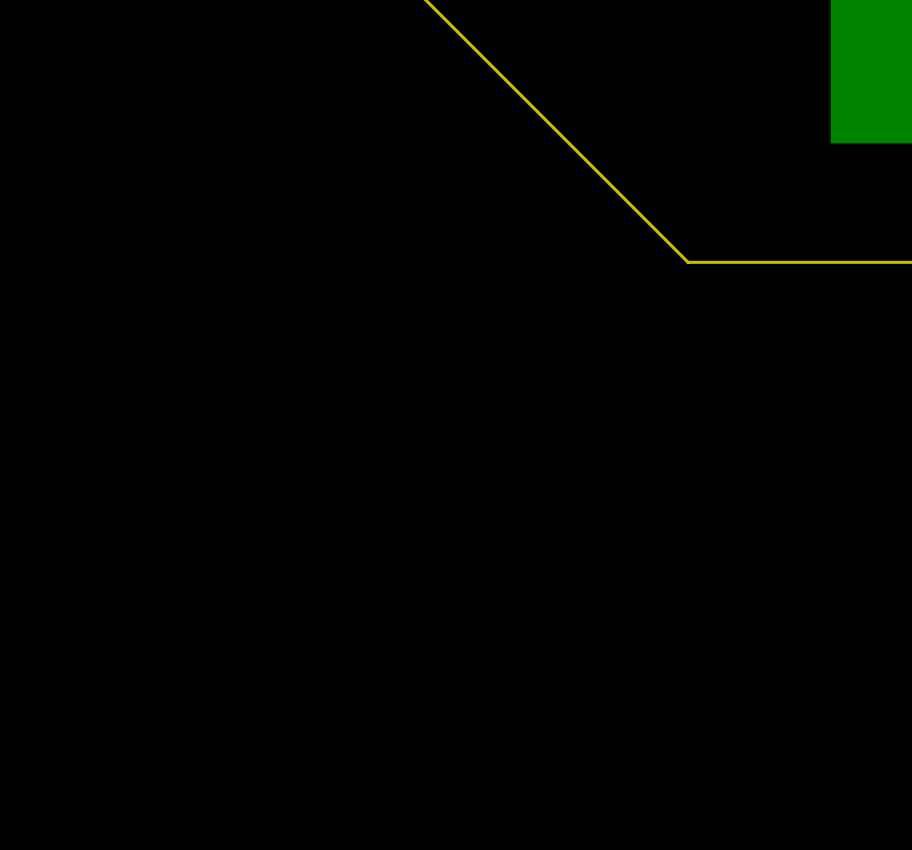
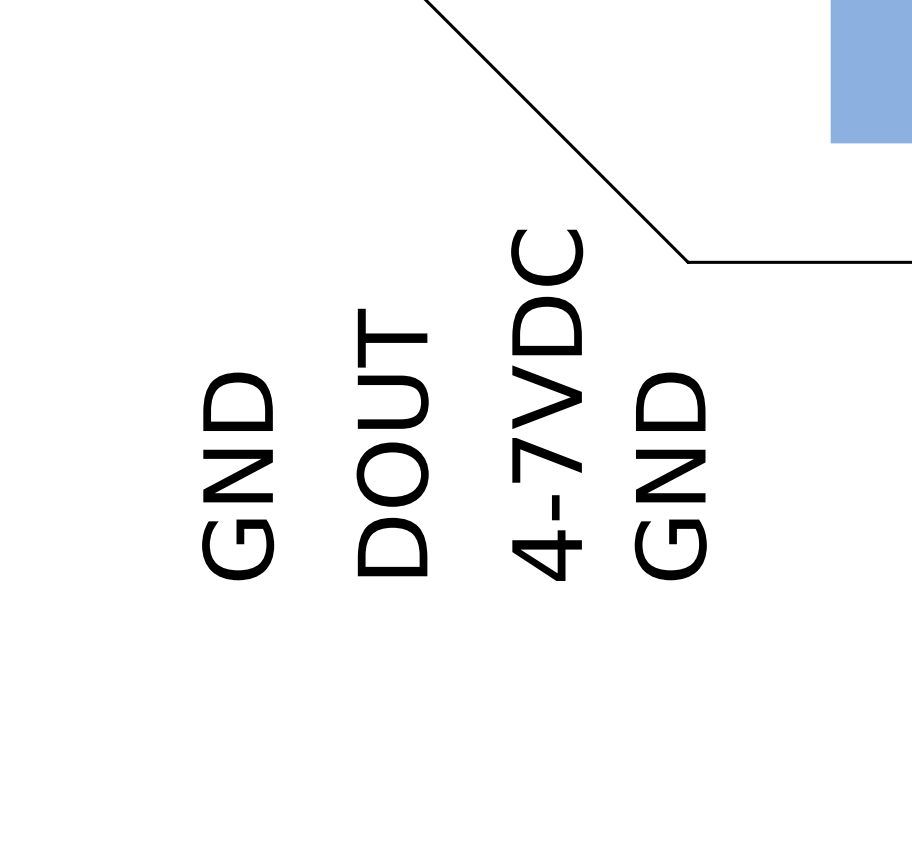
text: none -> 4-7VDC (547, 405)
text: none -> DOUT (392, 442)
text: none -> GND (238, 476)
text: none -> GND (670, 476)

